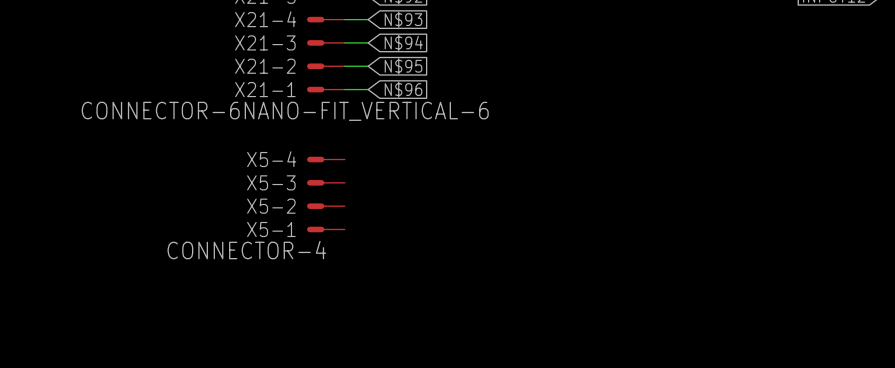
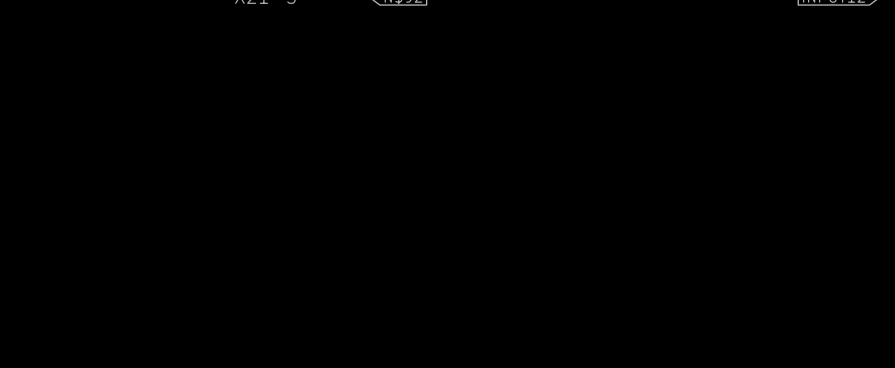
X21-4: (325, 19) -> none
wire: (344, 19) (368, 19) -> none
global label: N$93 (403, 19) -> none
X21-3: (325, 42) -> none
wire: (344, 42) (368, 42) -> none
global label: N$94 (403, 42) -> none
X21-2: (325, 66) -> none
wire: (344, 66) (368, 66) -> none
global label: N$95 (403, 66) -> none
X21-1: CONNECTOR-6NANO-FIT_VERTICAL-6 (325, 89) -> none
wire: (344, 89) (368, 89) -> none
global label: N$96 (403, 89) -> none
X5-4: (325, 159) -> none
X5-3: (325, 182) -> none
X5-2: (325, 206) -> none
X5-1: CONNECTOR-4 (325, 229) -> none

